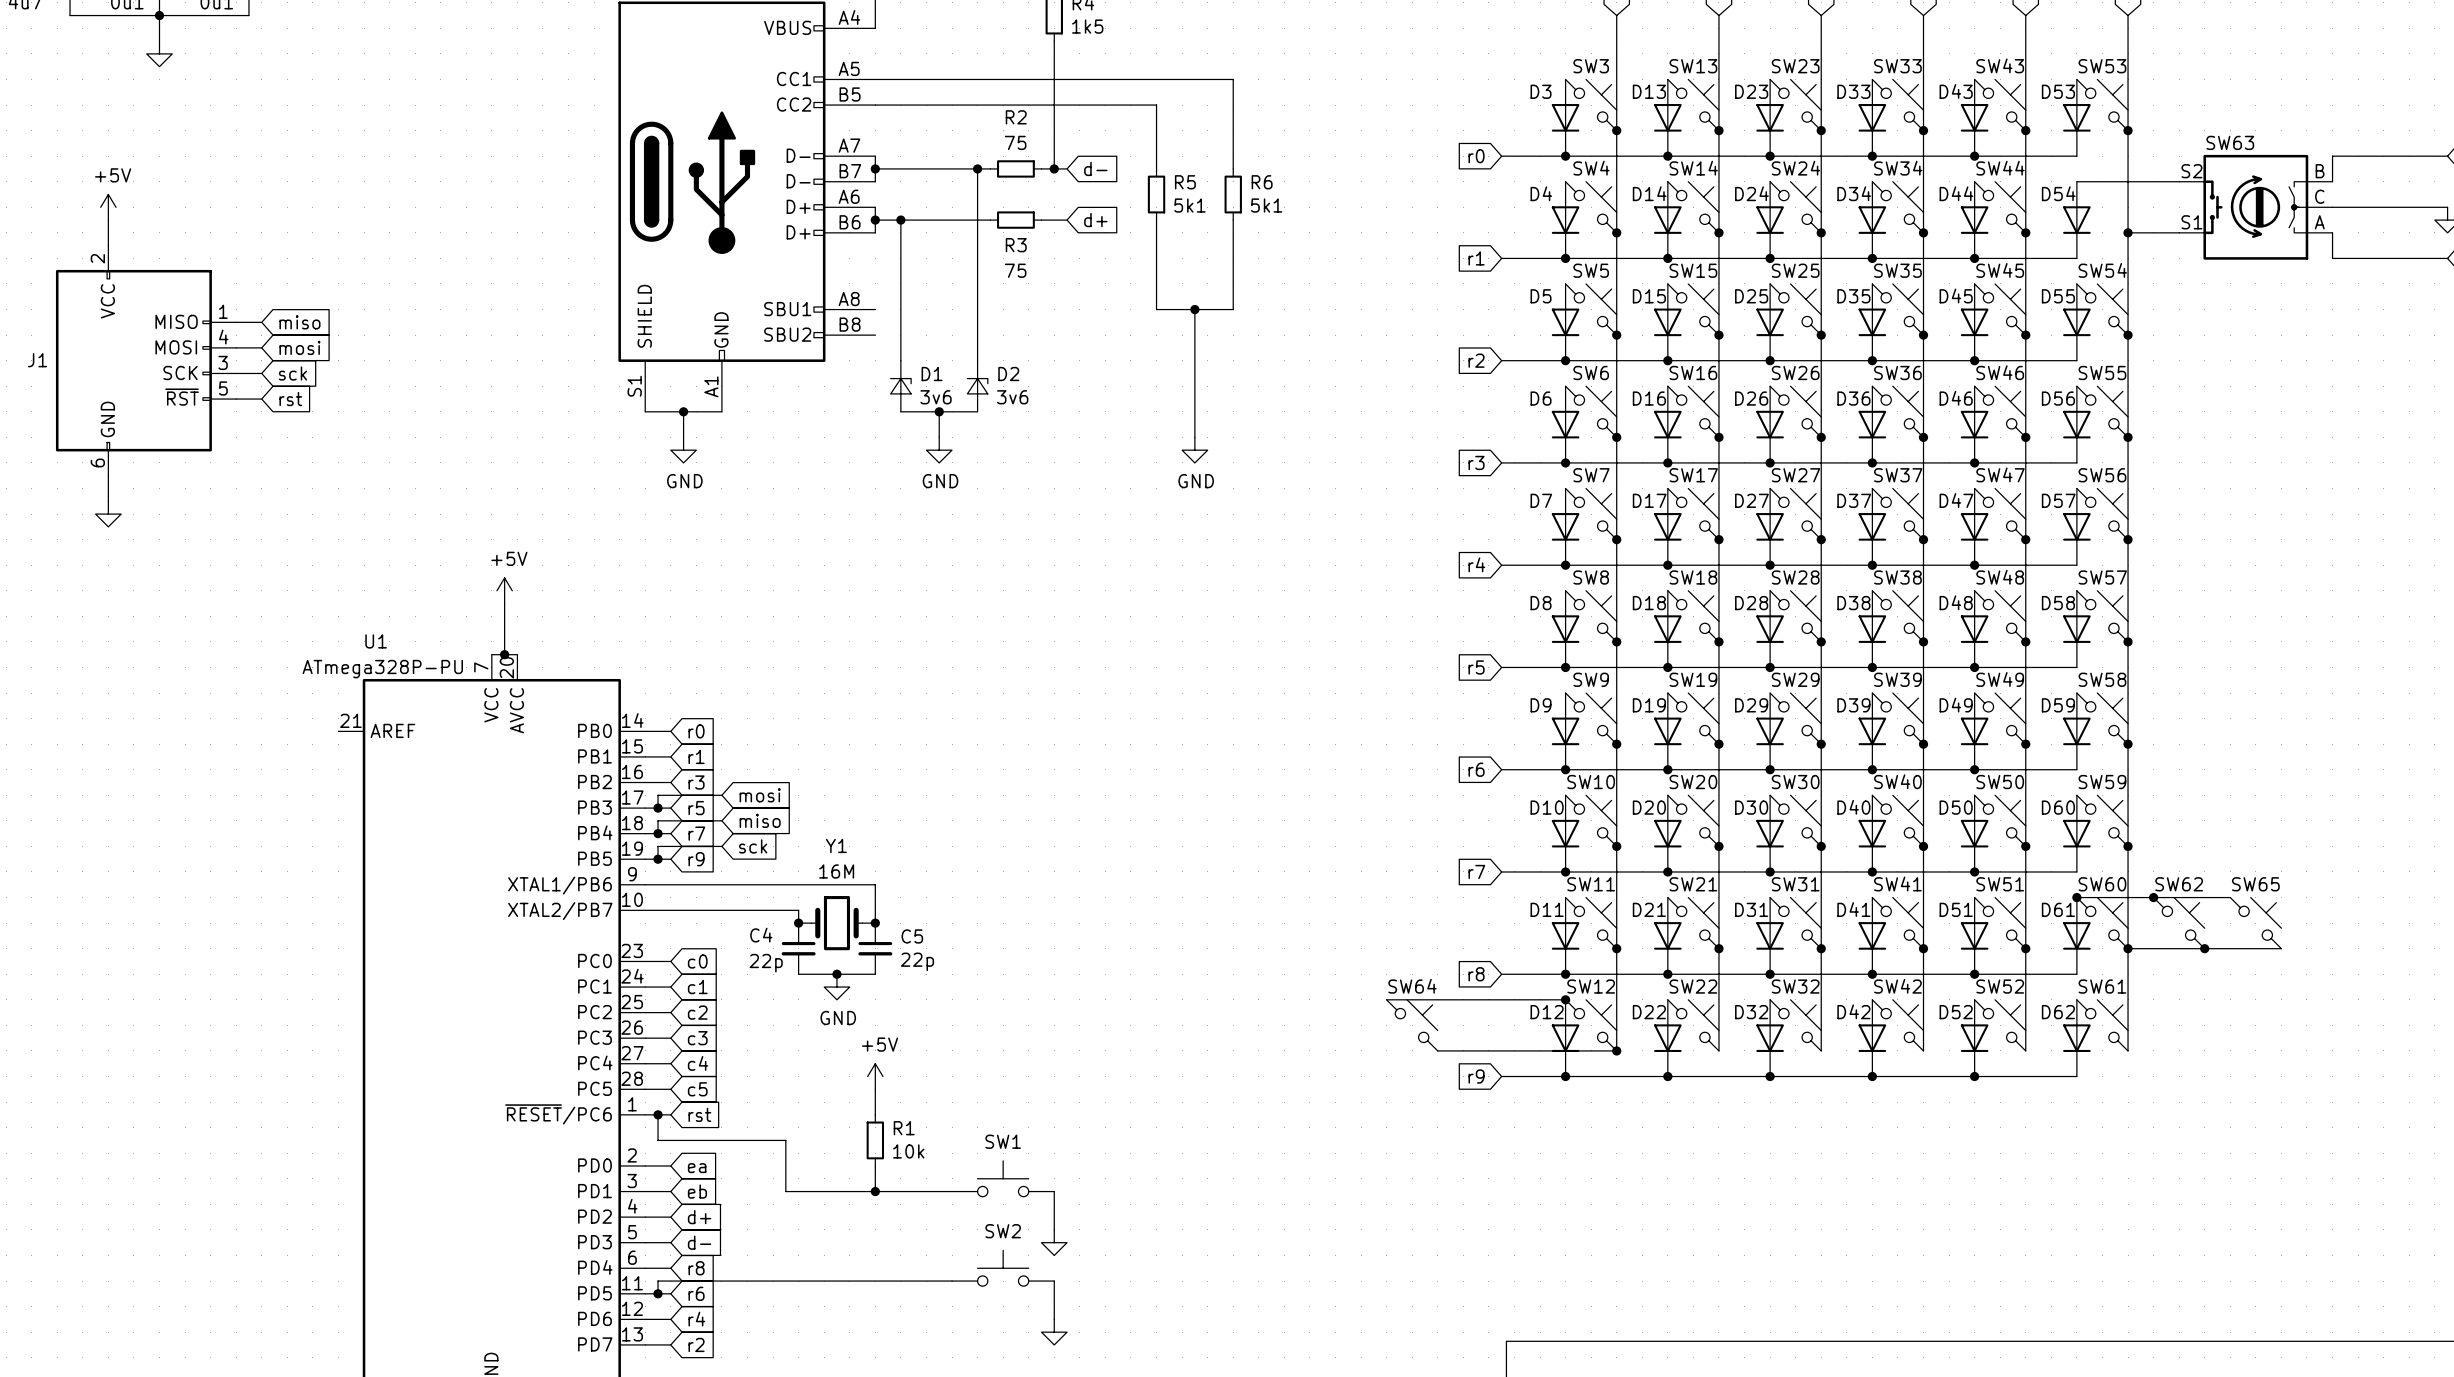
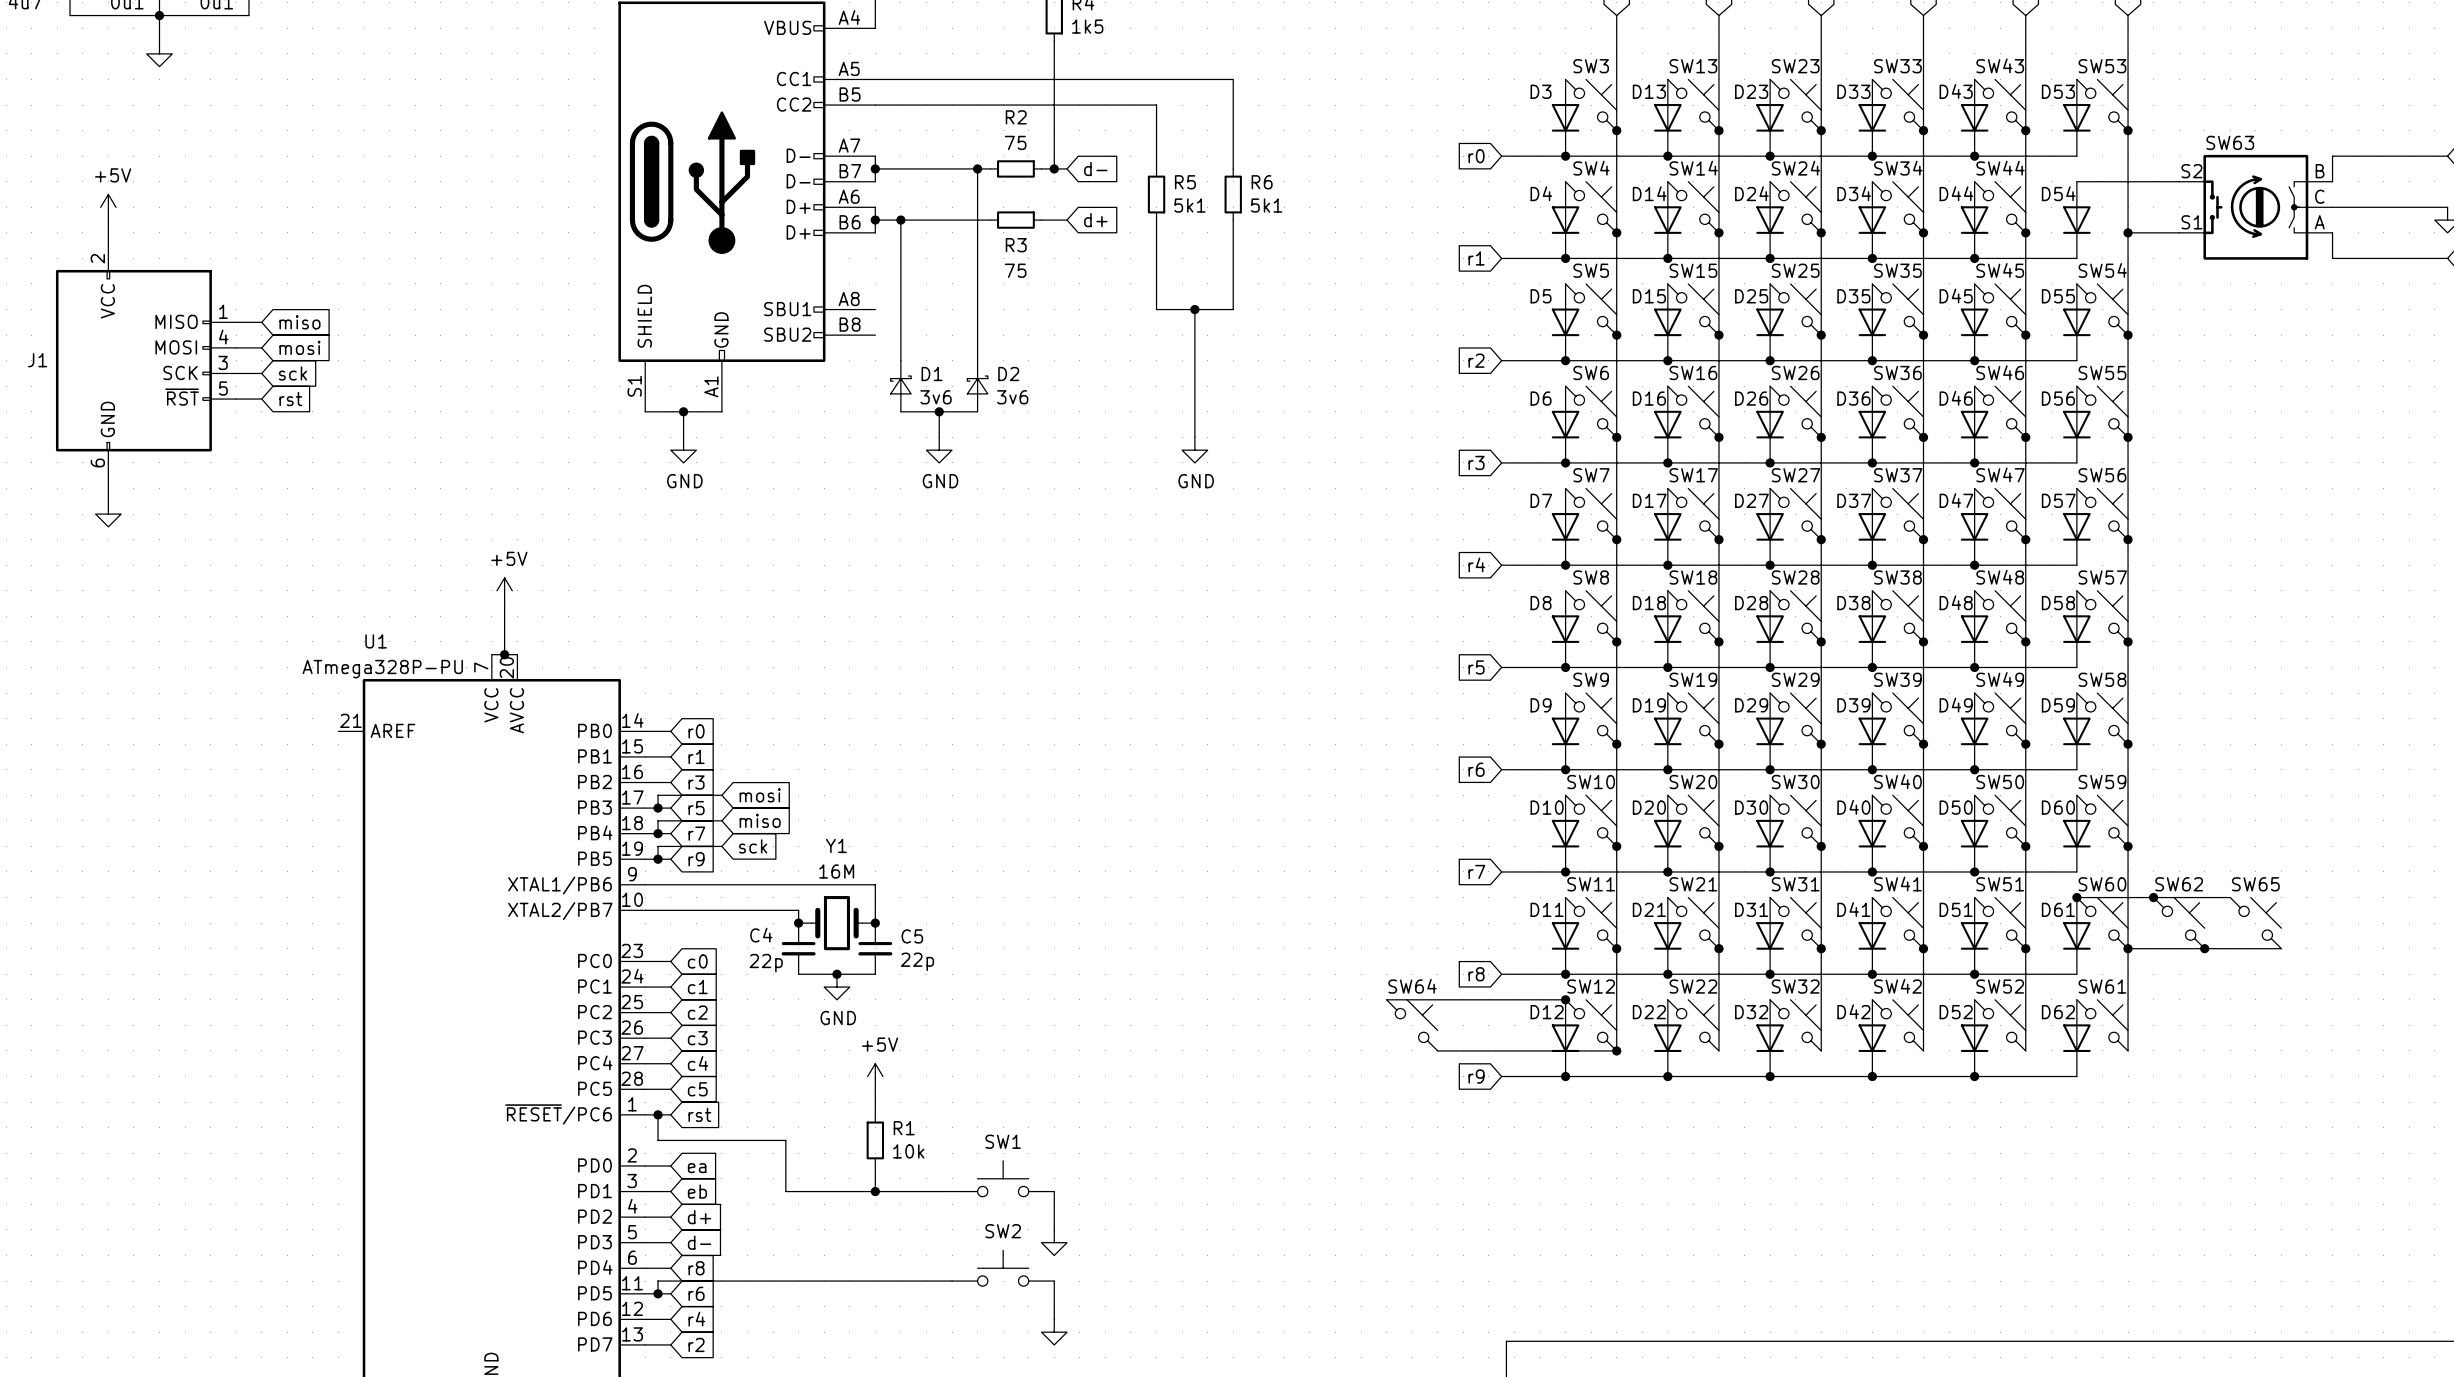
D1 symbol: [890, 360, 912, 412] -> [890, 360, 912, 412]
D2 symbol: [967, 360, 988, 412] -> [967, 360, 988, 412]

